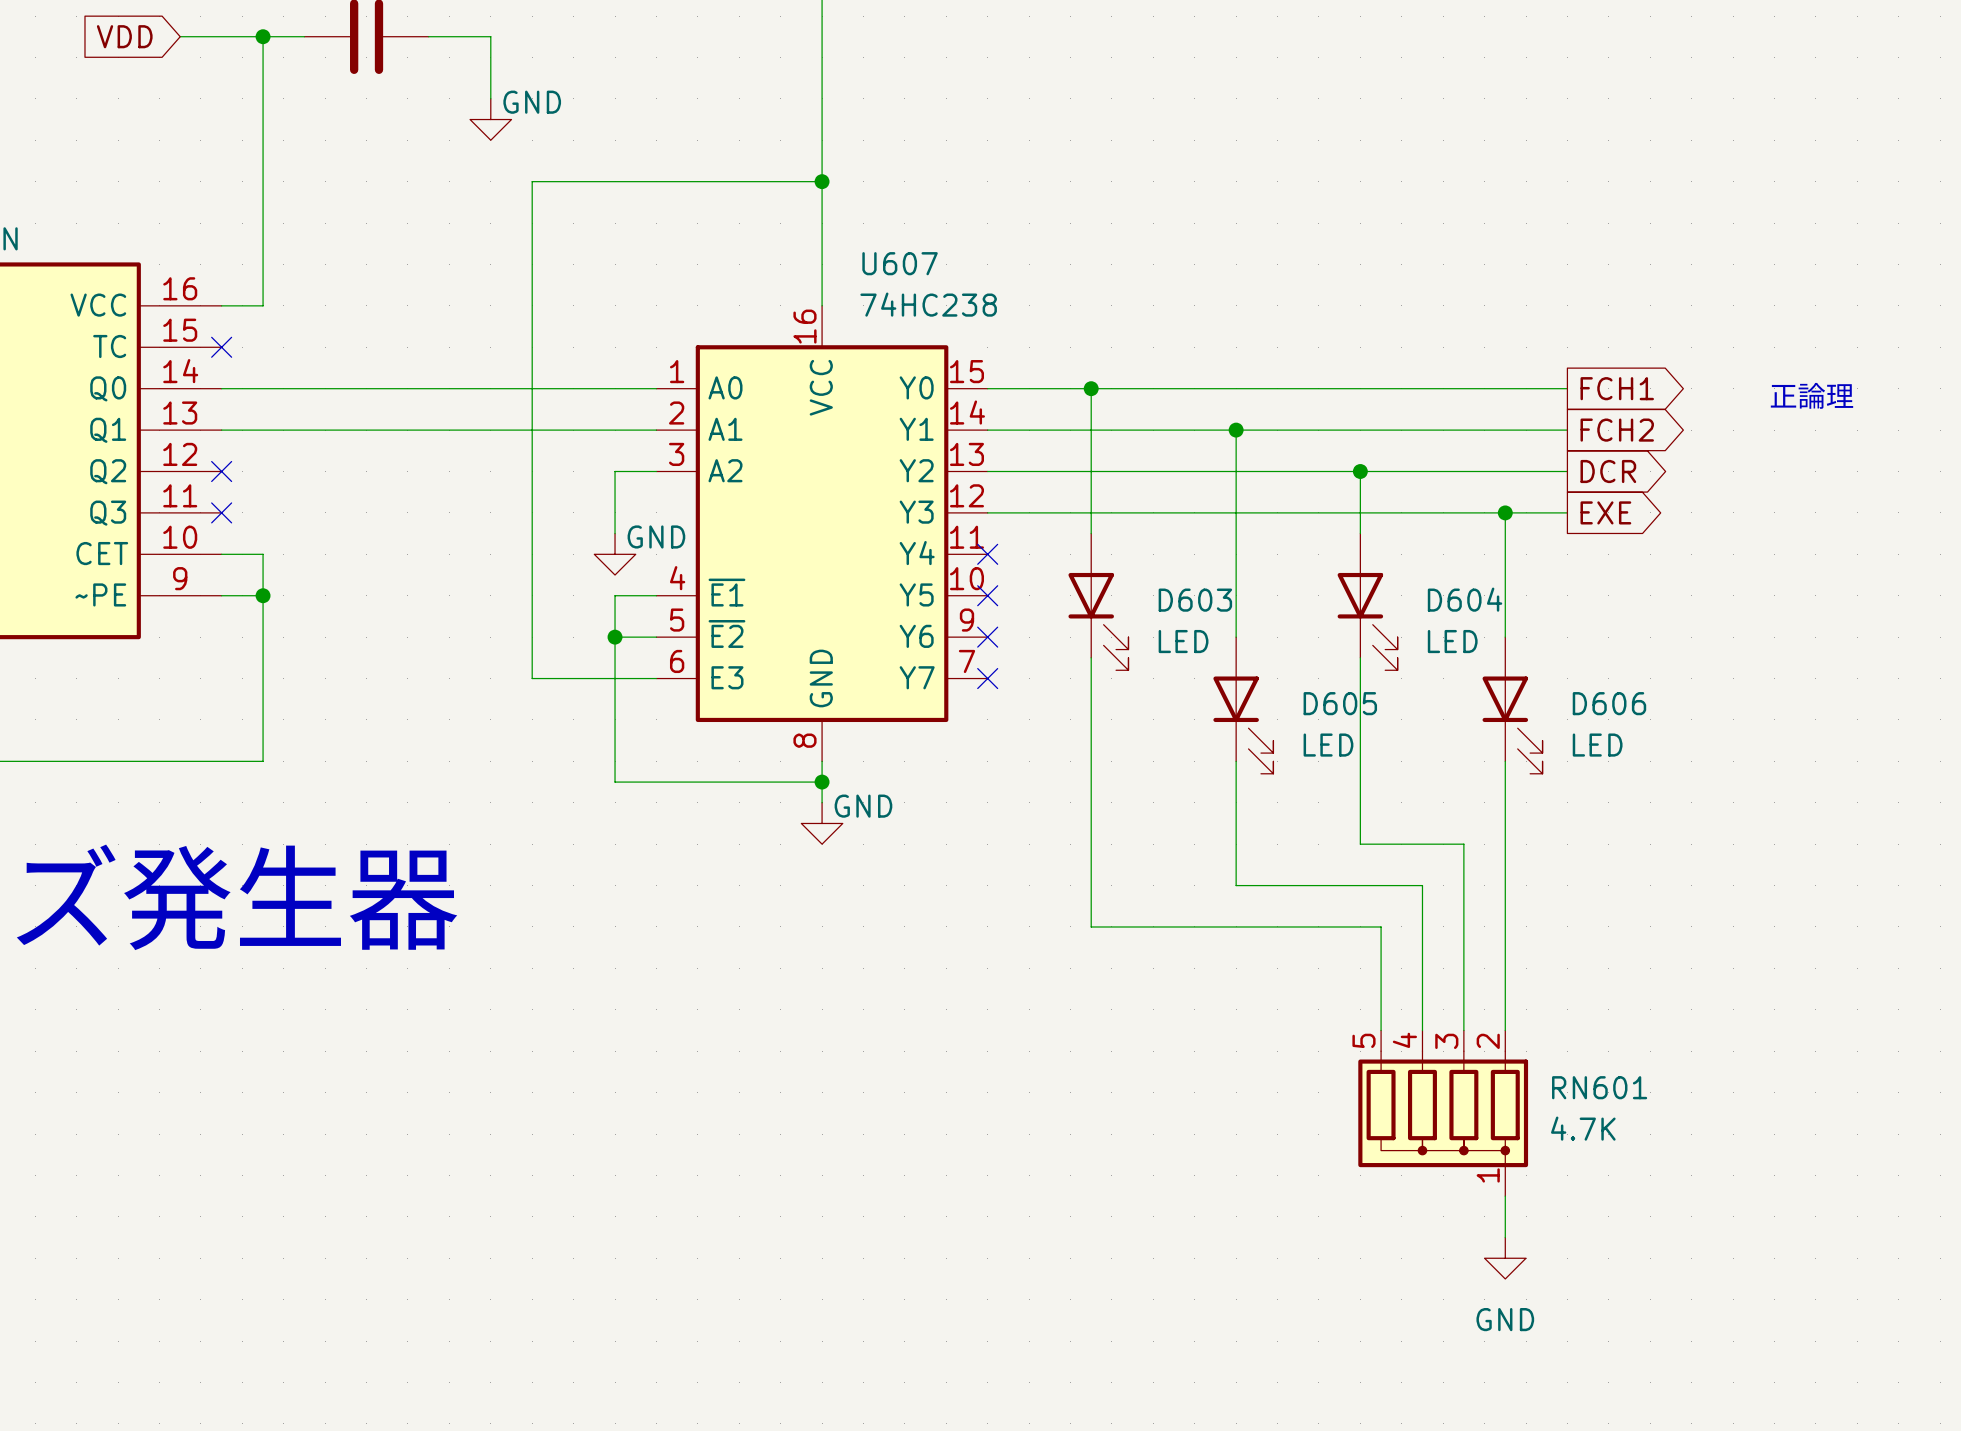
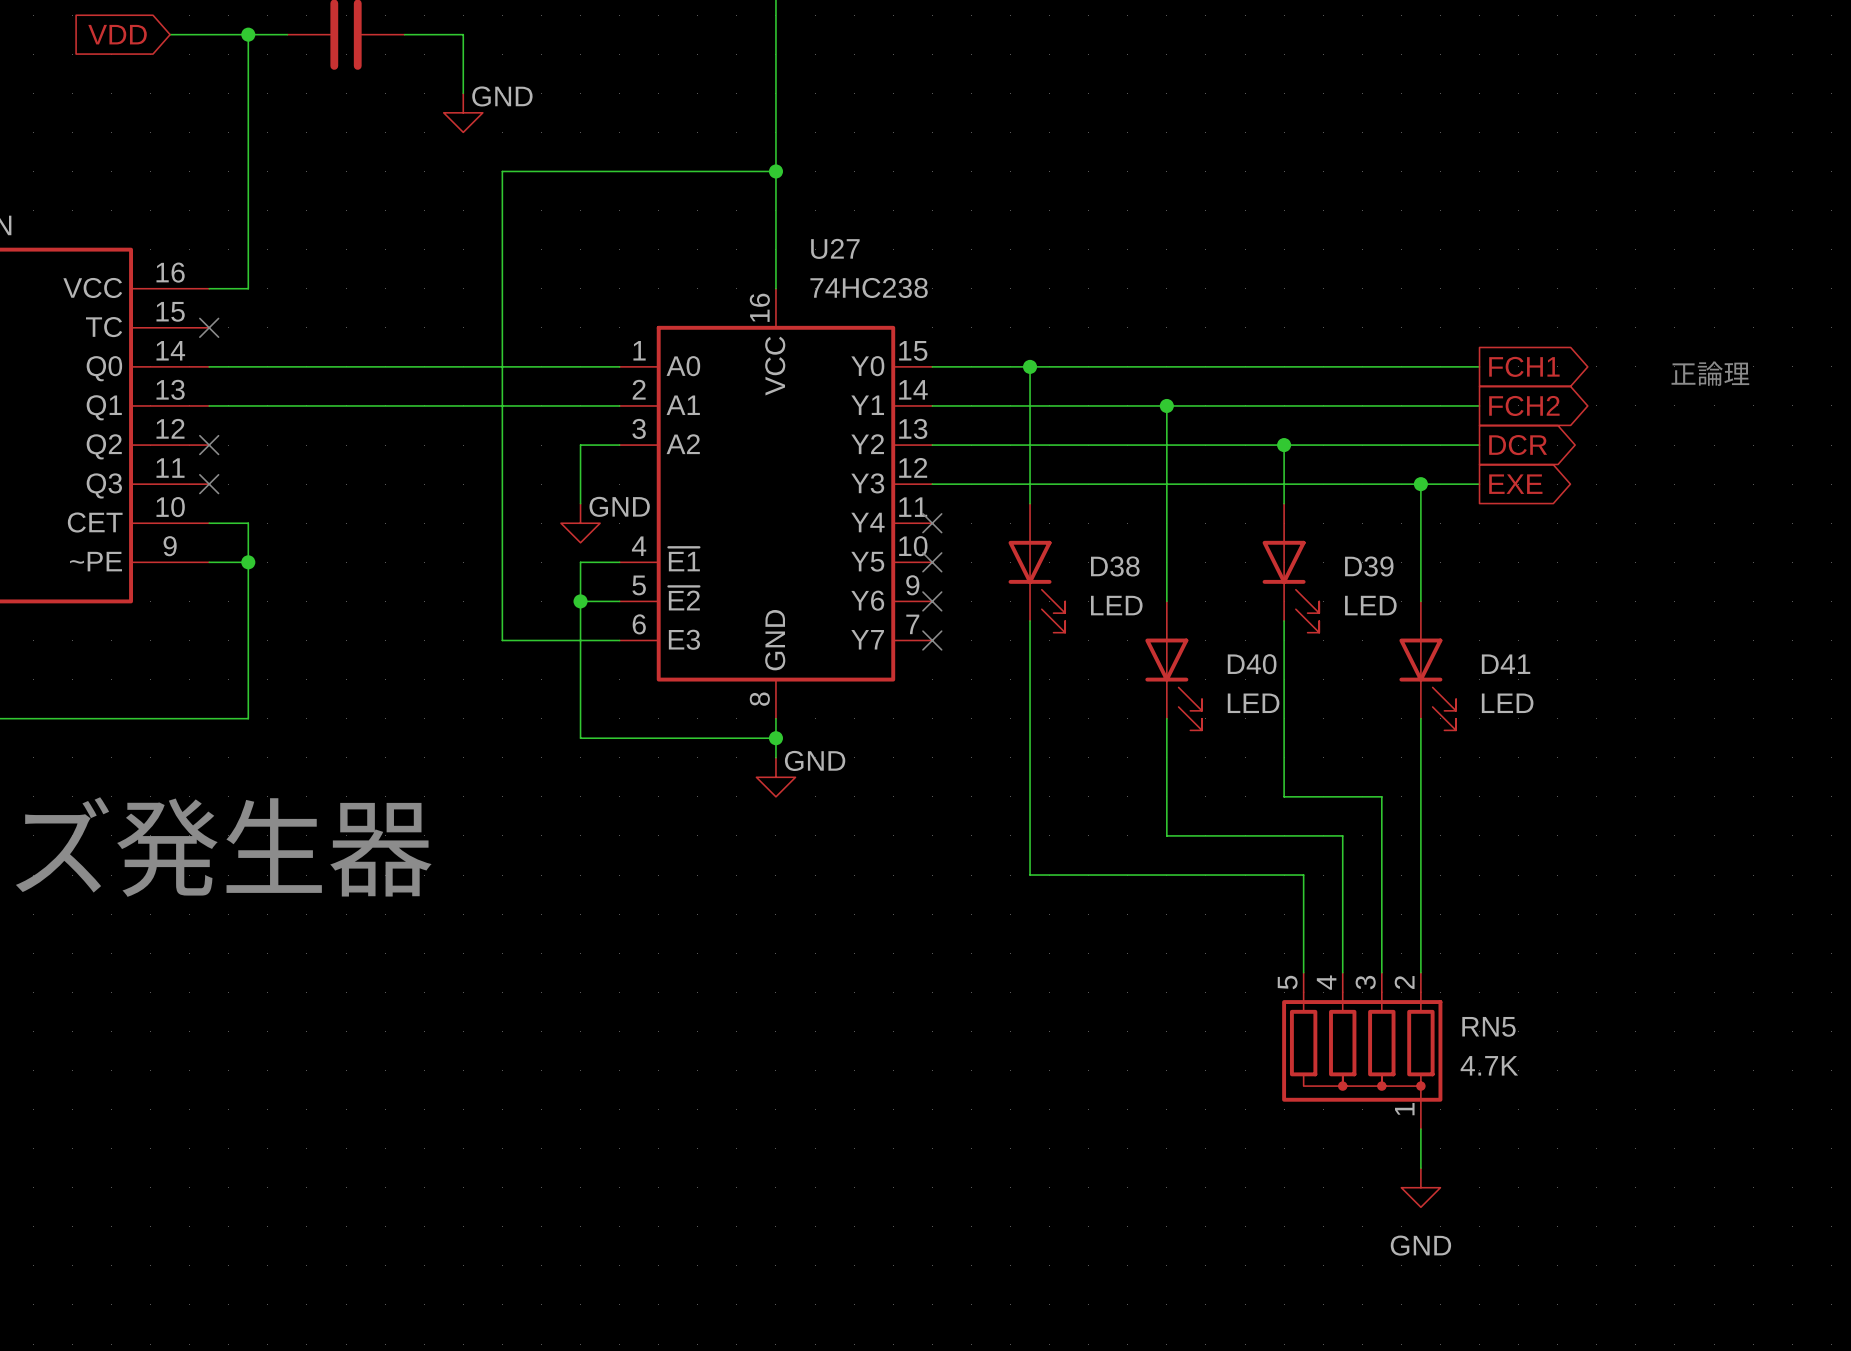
U607 name: U607 (900, 263) -> U27 (835, 248)
D604 name: D604 (1465, 599) -> D39 (1369, 566)
D603 name: D603 (1195, 600) -> D38 (1115, 566)
D605 name: D605 (1340, 703) -> D40 (1252, 664)
D606 name: D606 (1609, 703) -> D41 (1506, 664)
RN601 name: RN601 (1599, 1087) -> RN5 (1488, 1026)

